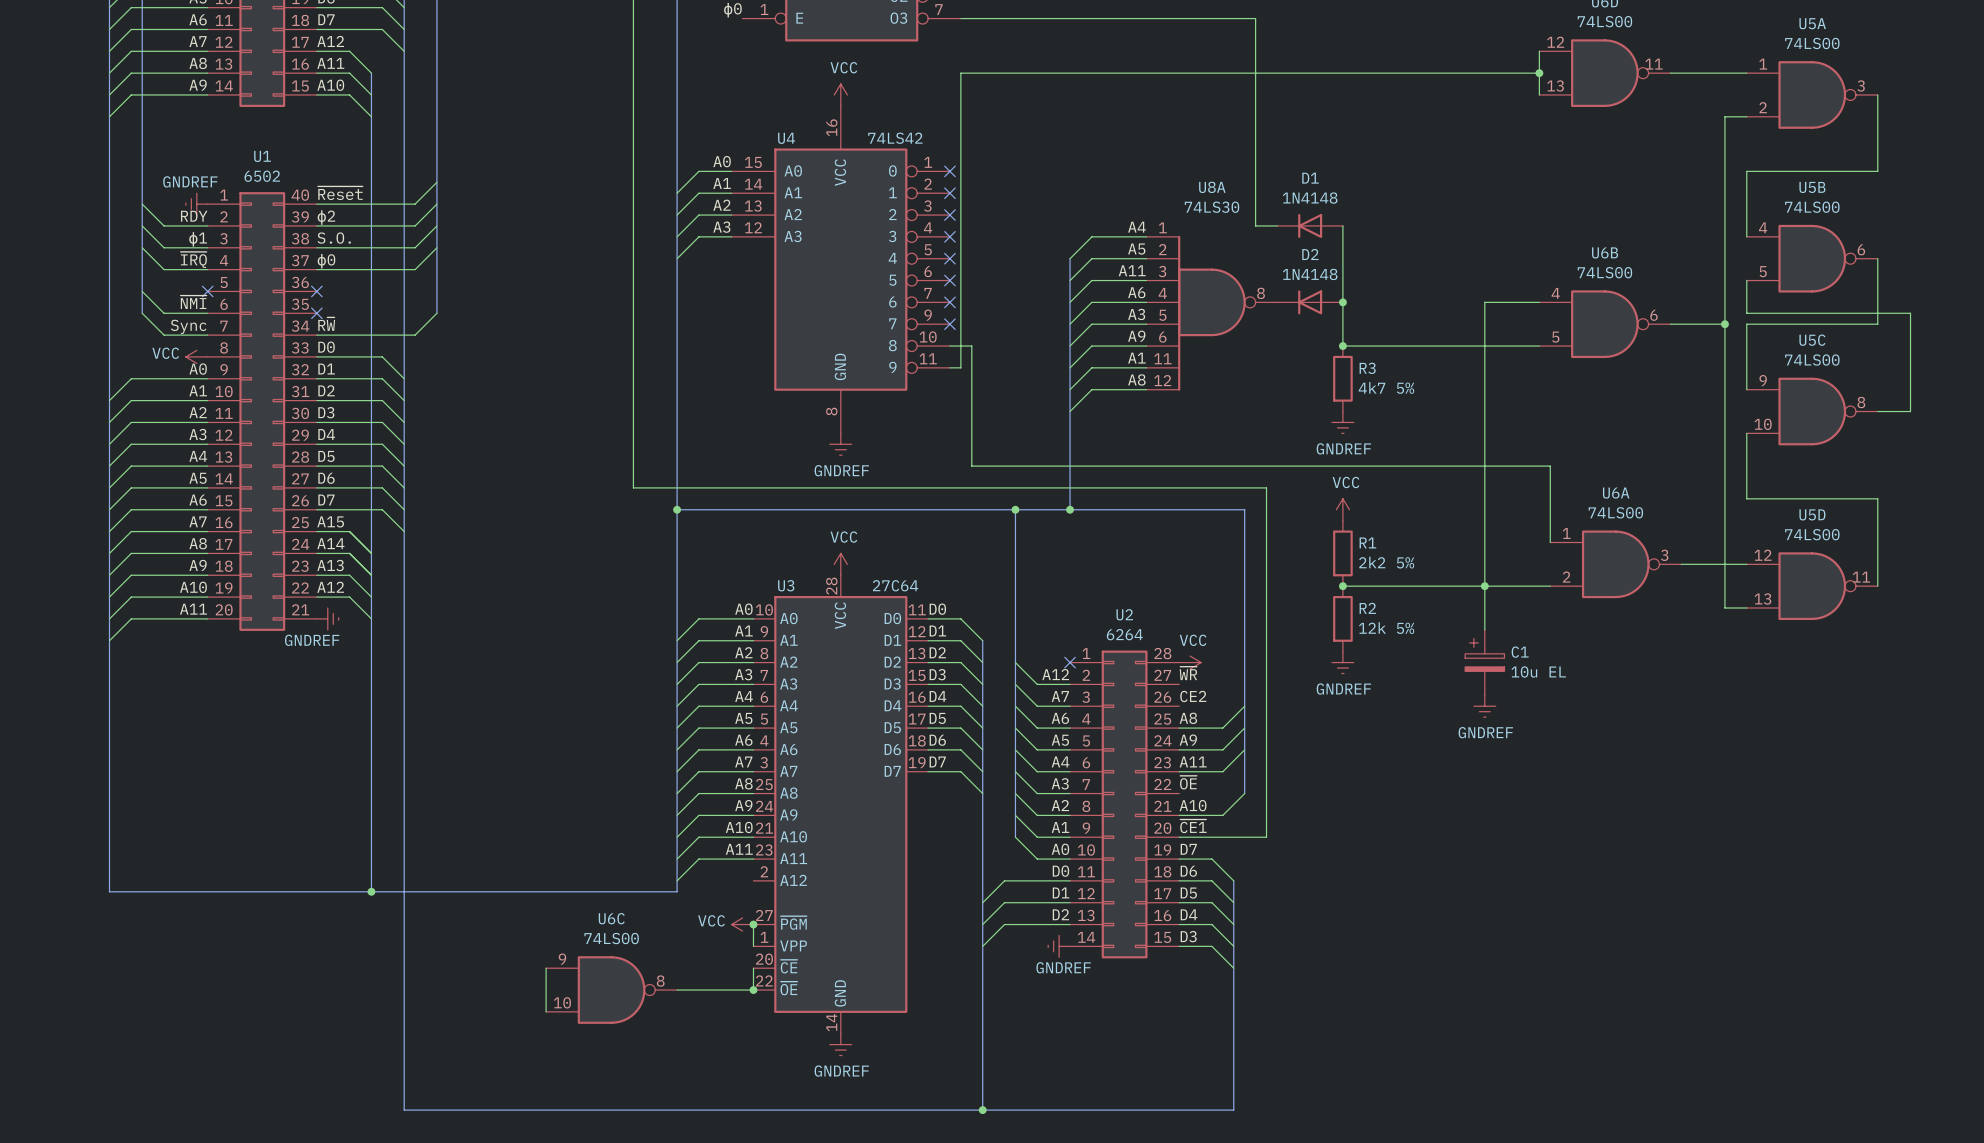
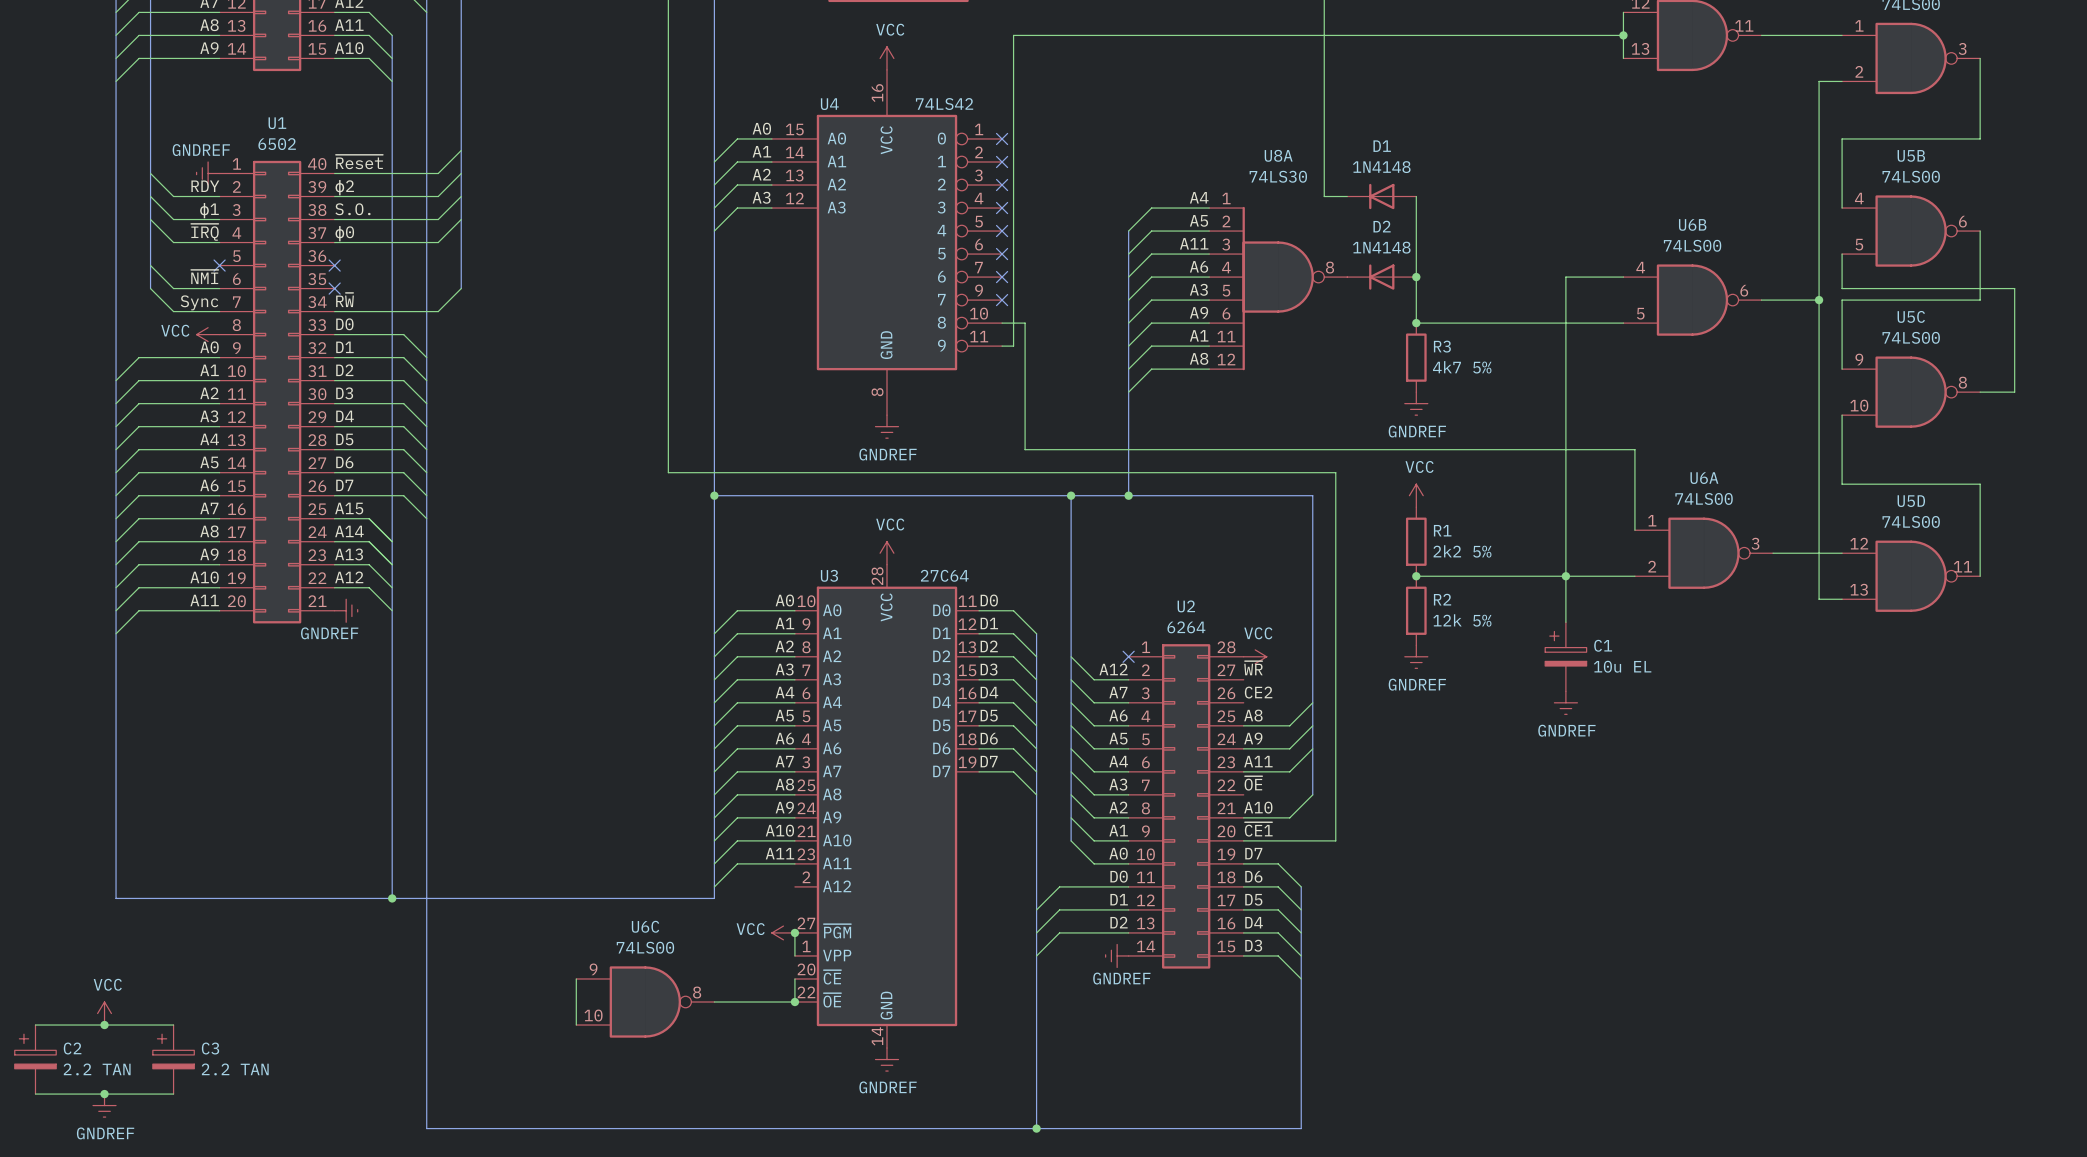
power symbol: none -> VCC (104, 1013)
wire: none -> (35, 1025) (173, 1025)
junction: none -> (104, 1025)
C2: none -> 2.2 TAN (35, 1059)
C3: none -> 2.2 TAN (173, 1059)
wire: none -> (35, 1094) (173, 1094)
junction: none -> (104, 1094)
power symbol: none -> GNDREF (104, 1105)

